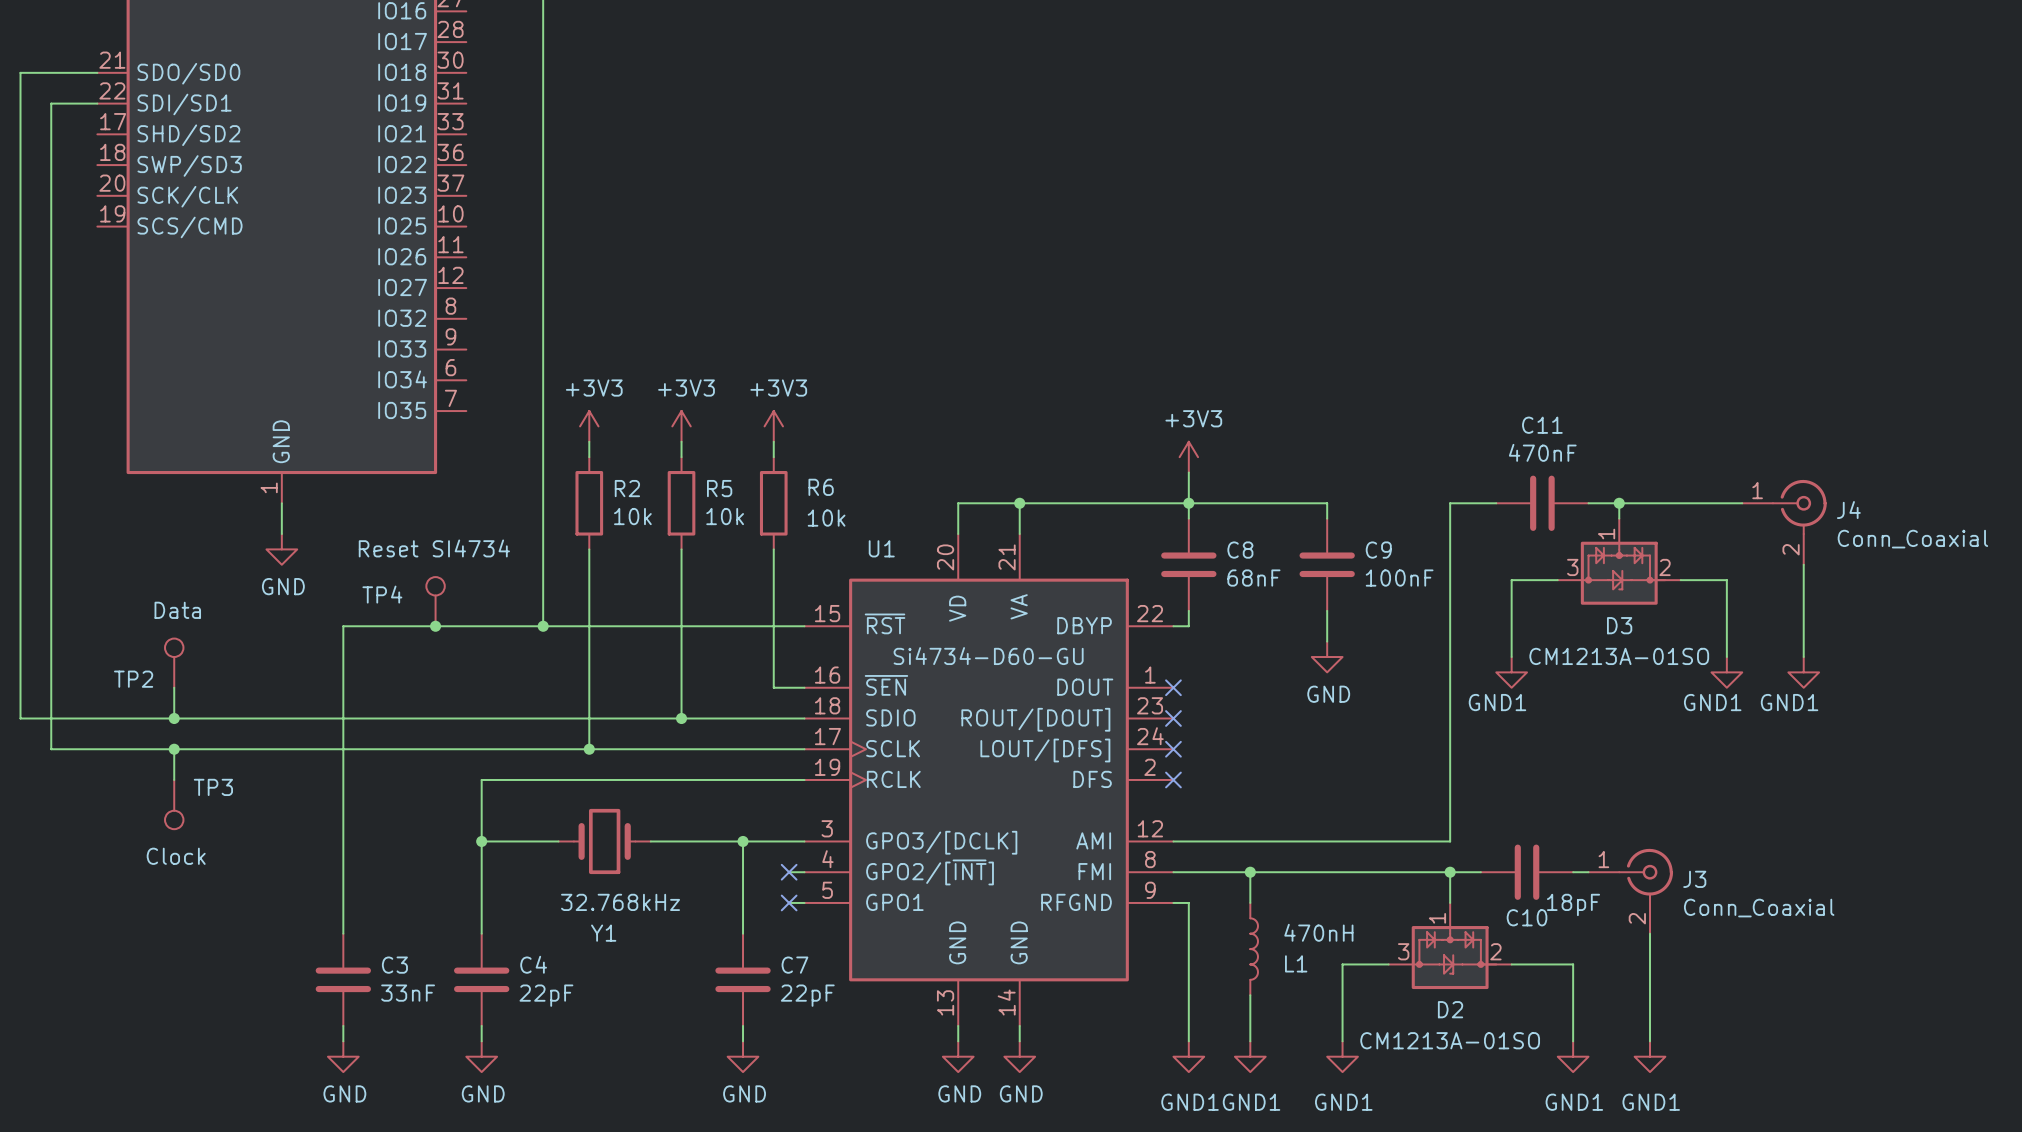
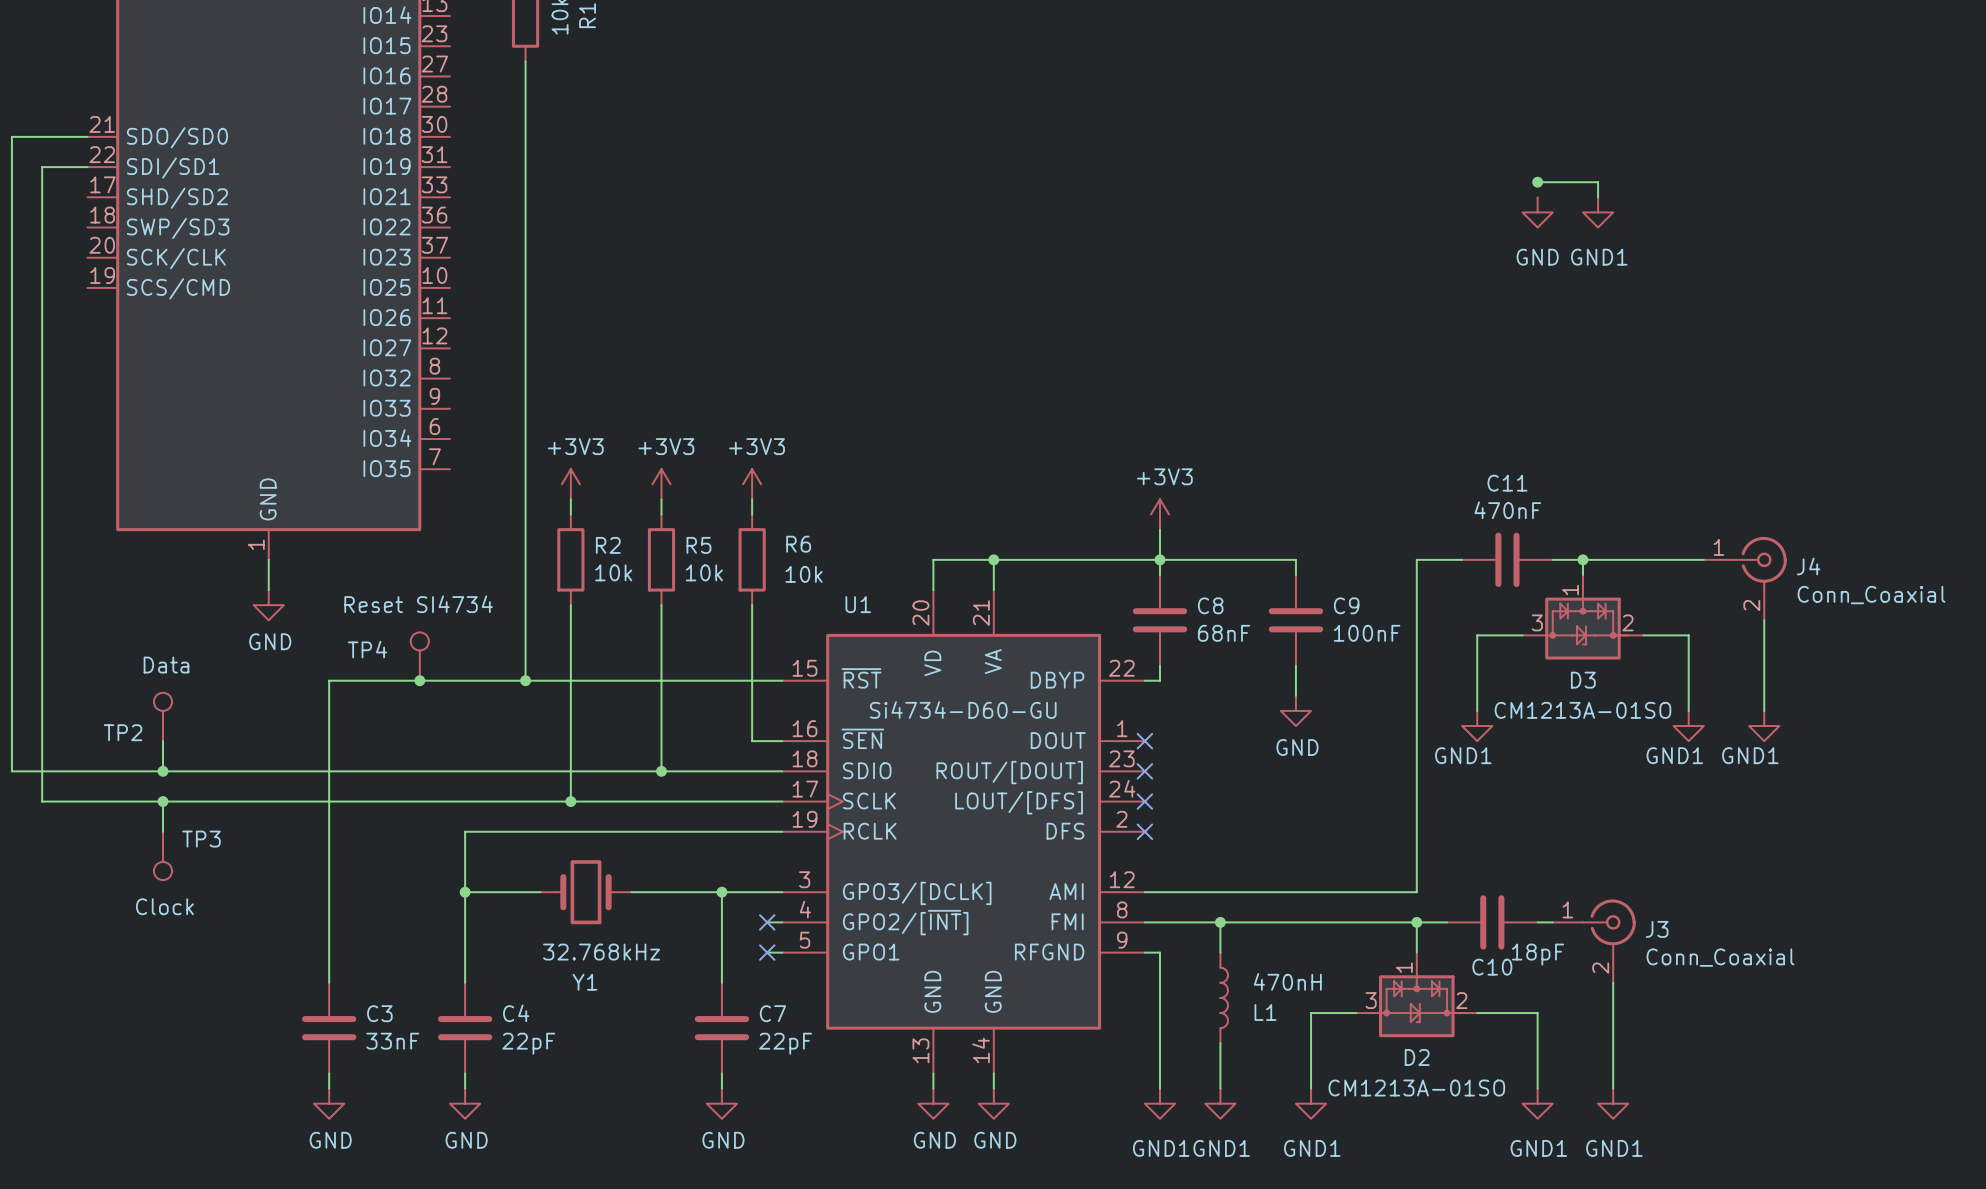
wire: none -> (1537, 182) (1598, 182) (1598, 197)
junction: none -> (1537, 182)
power symbol: none -> GND (1537, 212)
power symbol: none -> GND1 (1598, 212)

